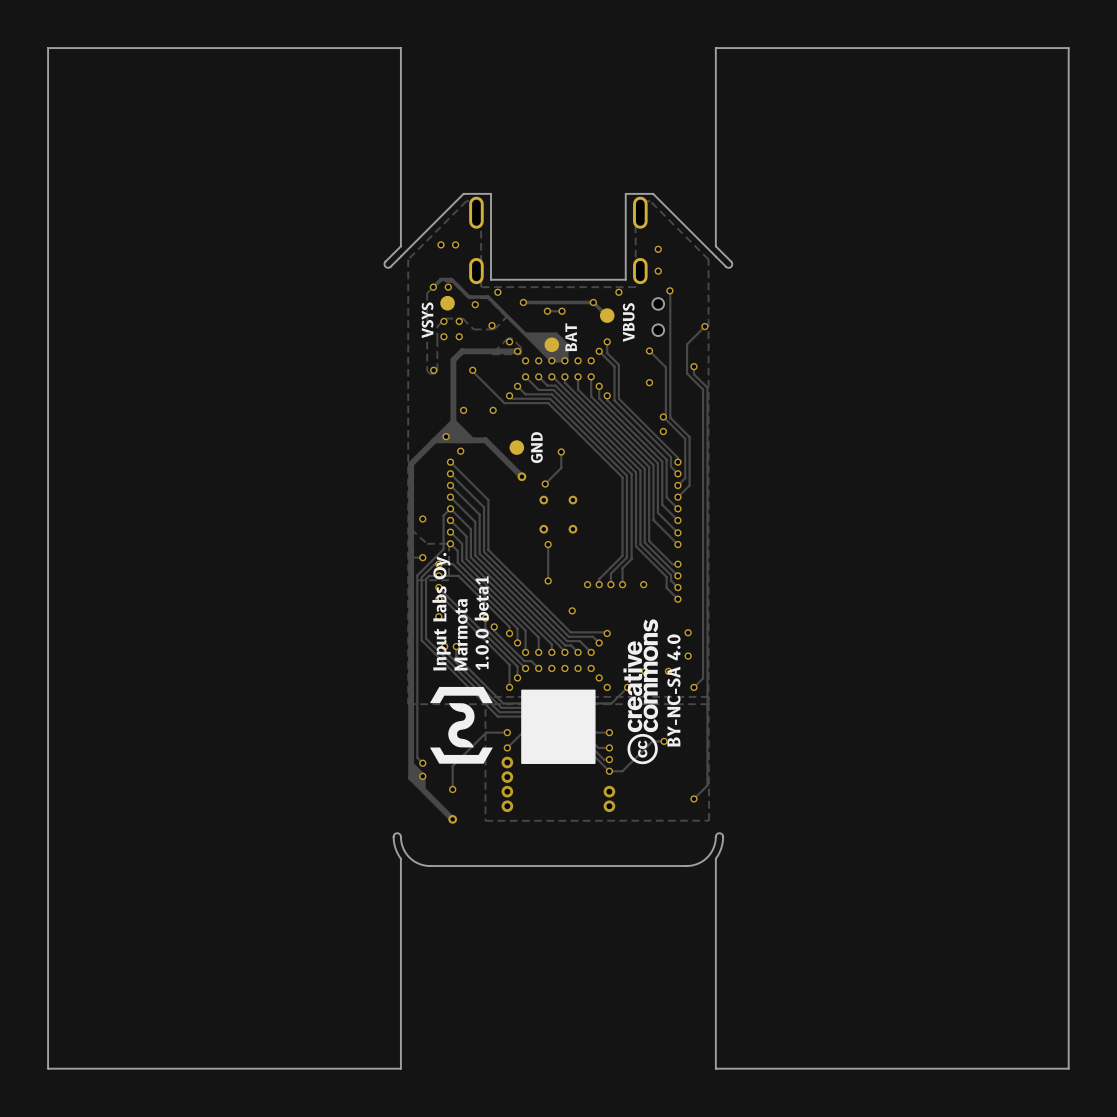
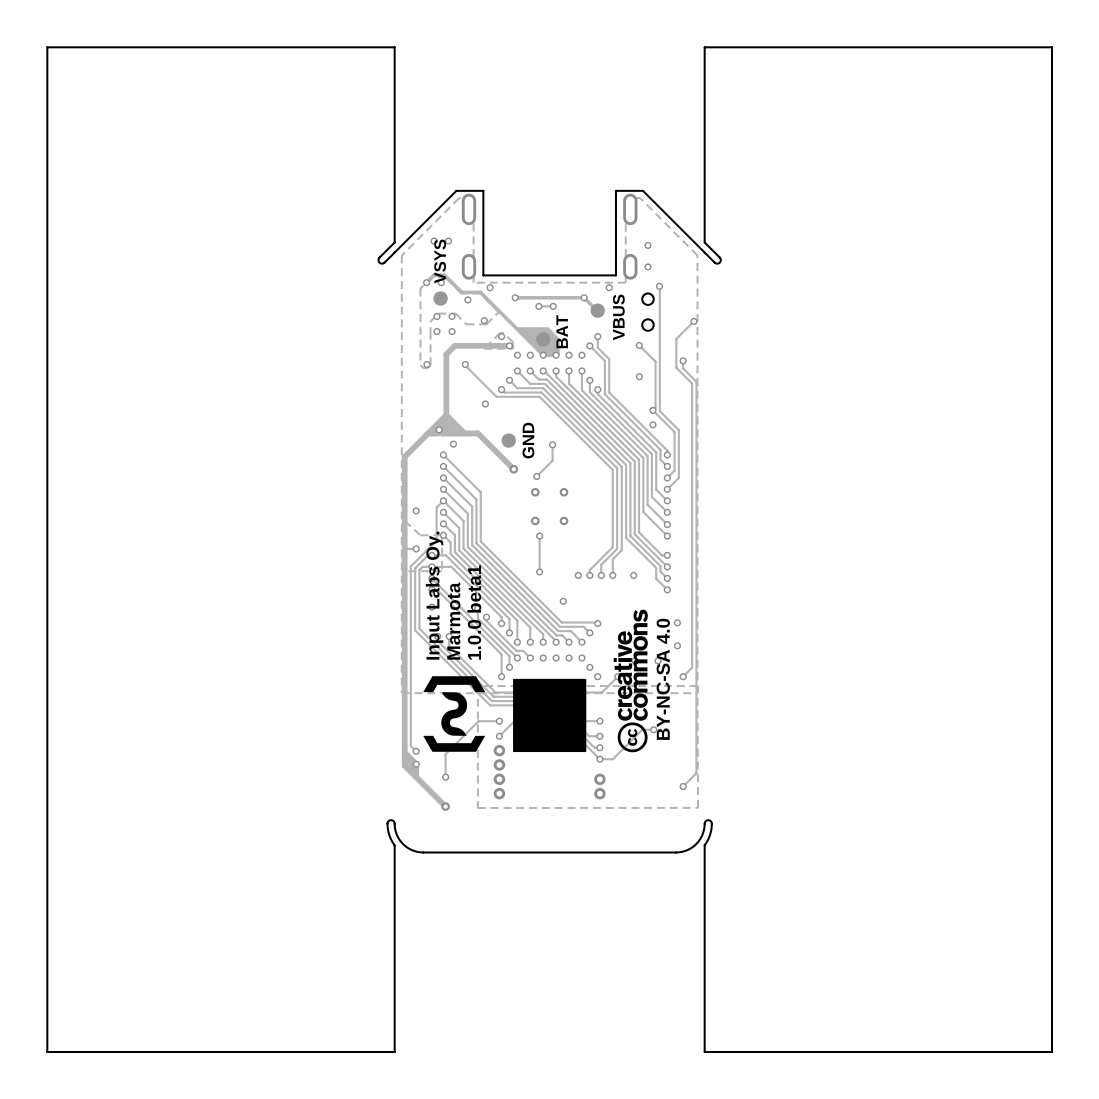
text position: VSYS (427, 320) -> VSYS (440, 261)
via: (463, 410) -> none

